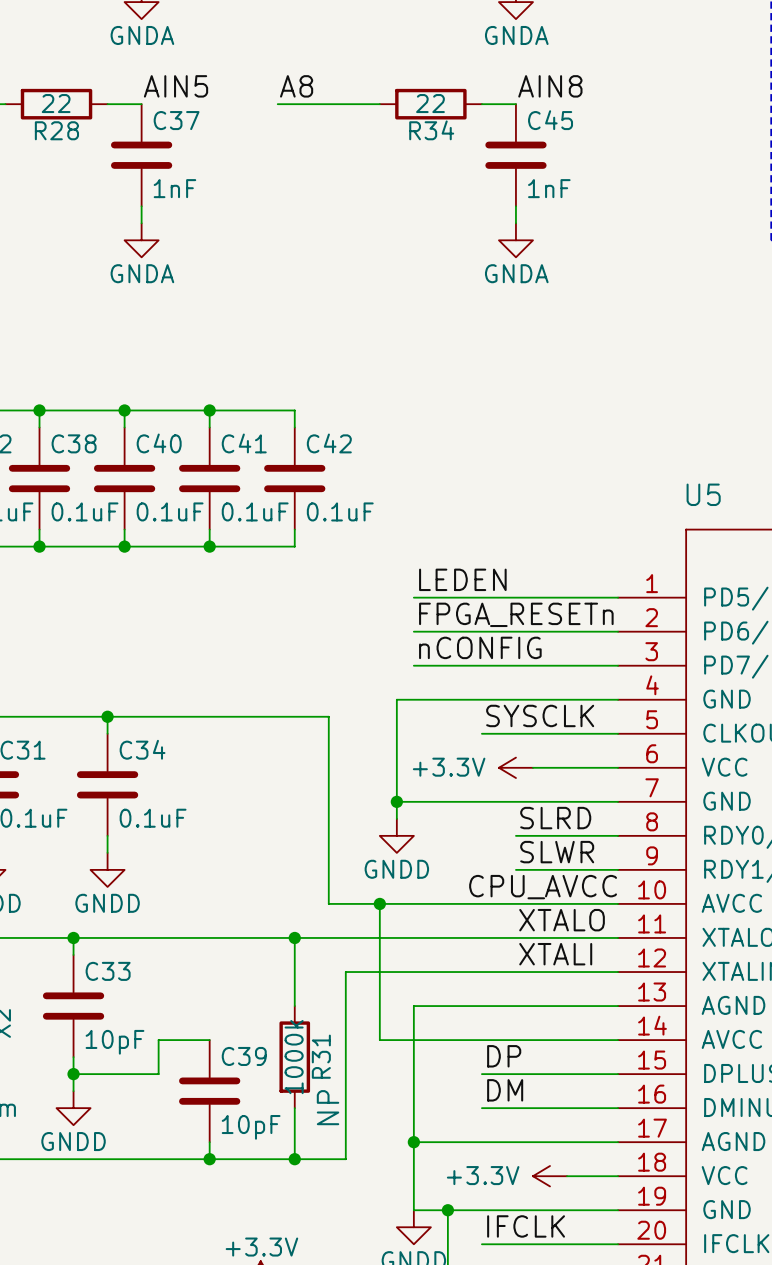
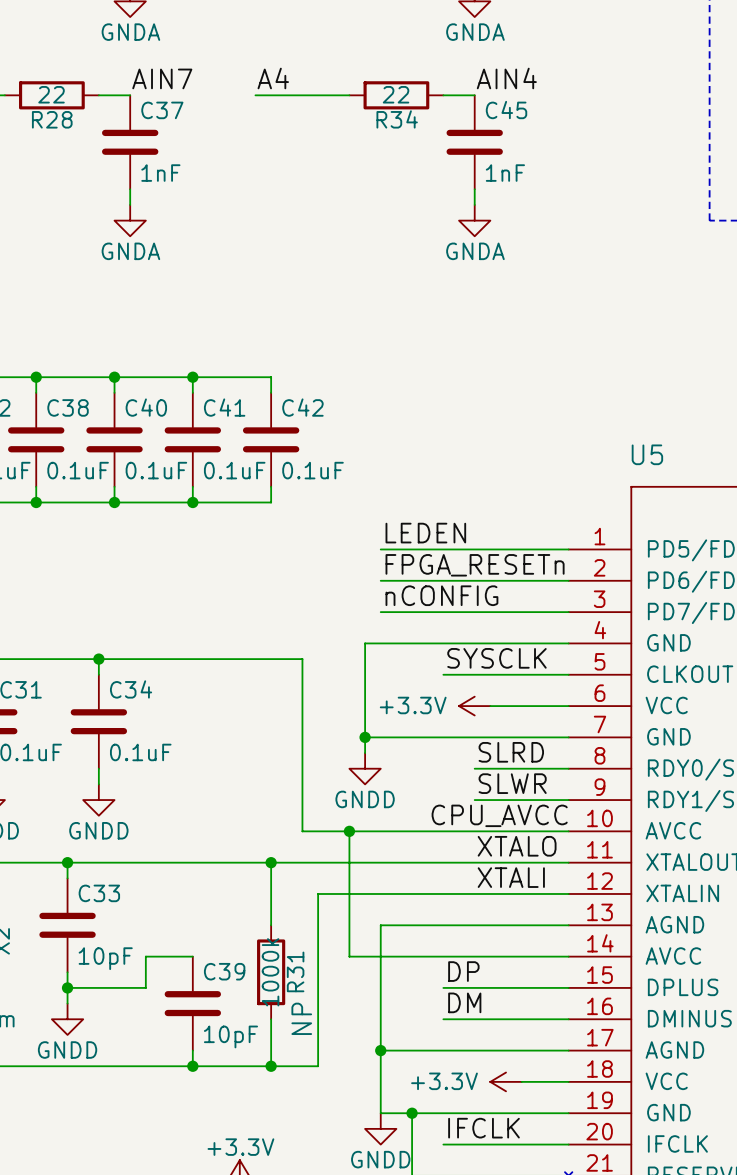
label: AIN5 (176, 86) -> AIN7 (162, 78)
label: A8 (296, 86) -> A4 (273, 78)
label: AIN8 (550, 86) -> AIN4 (506, 78)

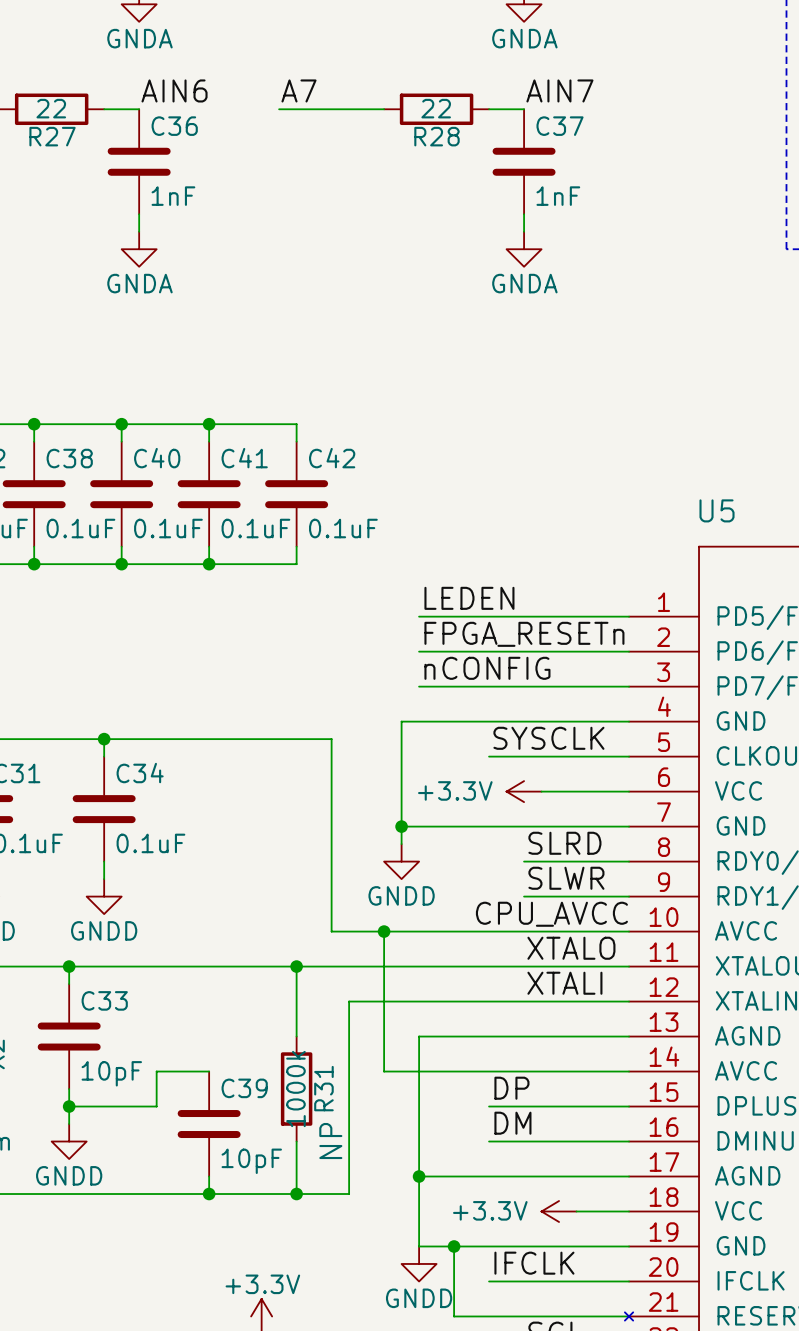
label: AIN7 (162, 78) -> AIN6 (174, 90)
label: A4 (273, 78) -> A7 (298, 90)
label: AIN4 (506, 78) -> AIN7 (559, 90)
C37 name: C37 (162, 110) -> C36 (174, 126)
C45 name: C45 (506, 110) -> C37 (560, 126)
R28 name: R28 (52, 119) -> R27 (52, 136)
R34 name: R34 (397, 119) -> R28 (436, 136)

